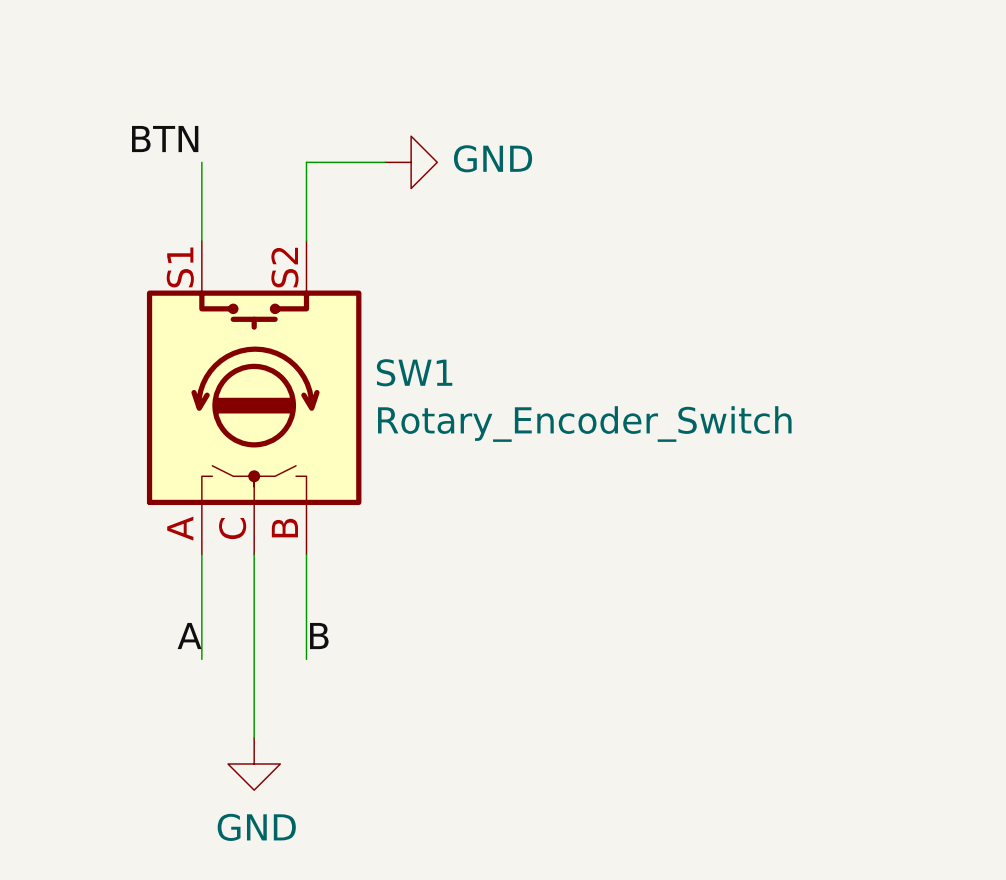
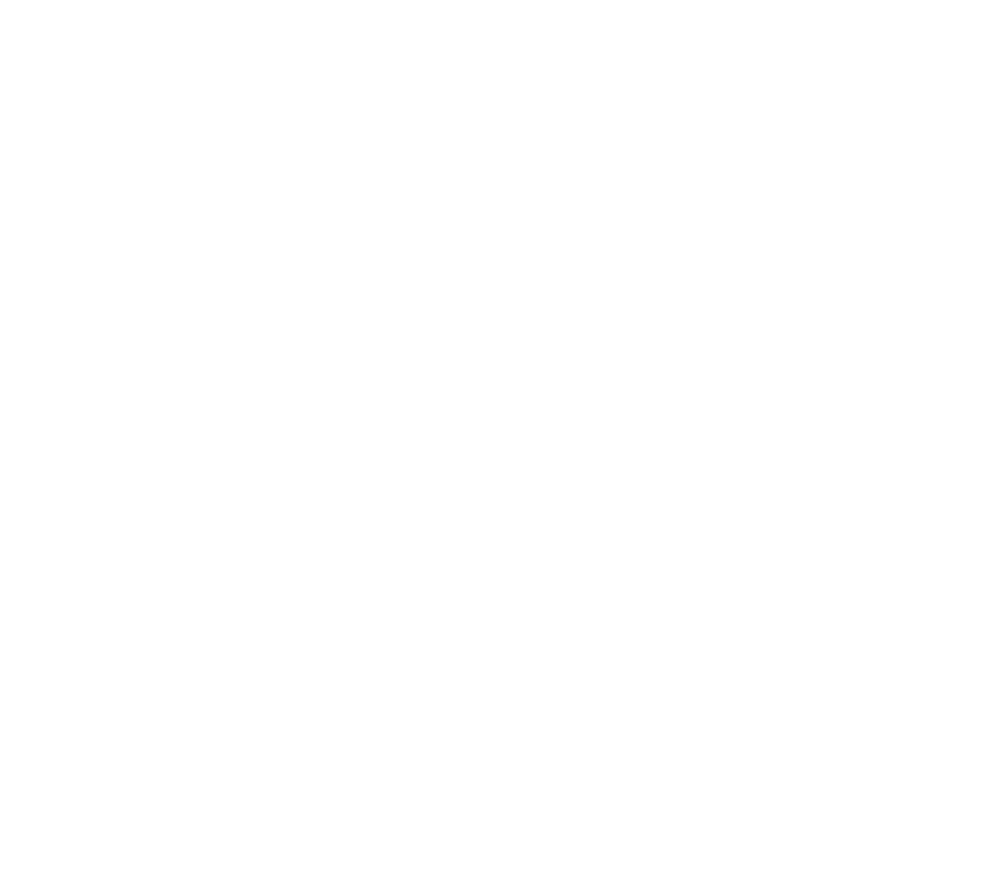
label: BTN (165, 139) -> none
wire: (201, 162) (201, 240) -> none
wire: (384, 162) (306, 162) (306, 240) -> none
power symbol: GND (411, 162) -> none
SW1: Rotary_Encoder_Switch (254, 397) -> none
wire: (201, 554) (201, 659) -> none
wire: (254, 554) (254, 737) -> none
wire: (306, 554) (306, 659) -> none
label: A (189, 636) -> none
label: B (319, 636) -> none
power symbol: GND (254, 763) -> none

